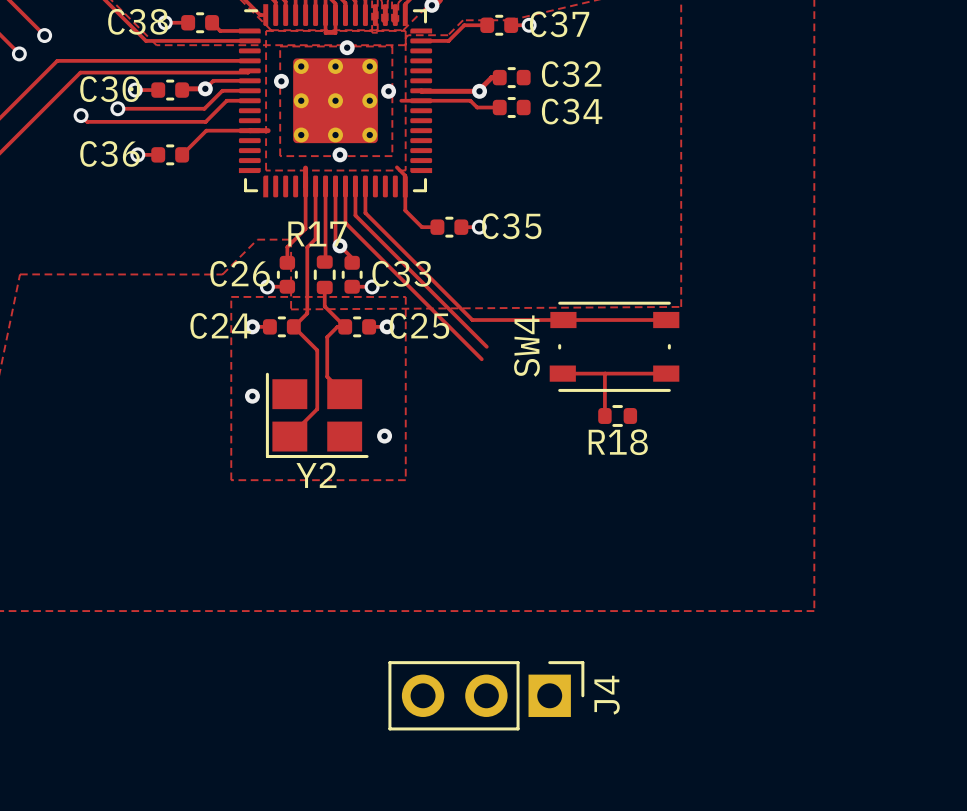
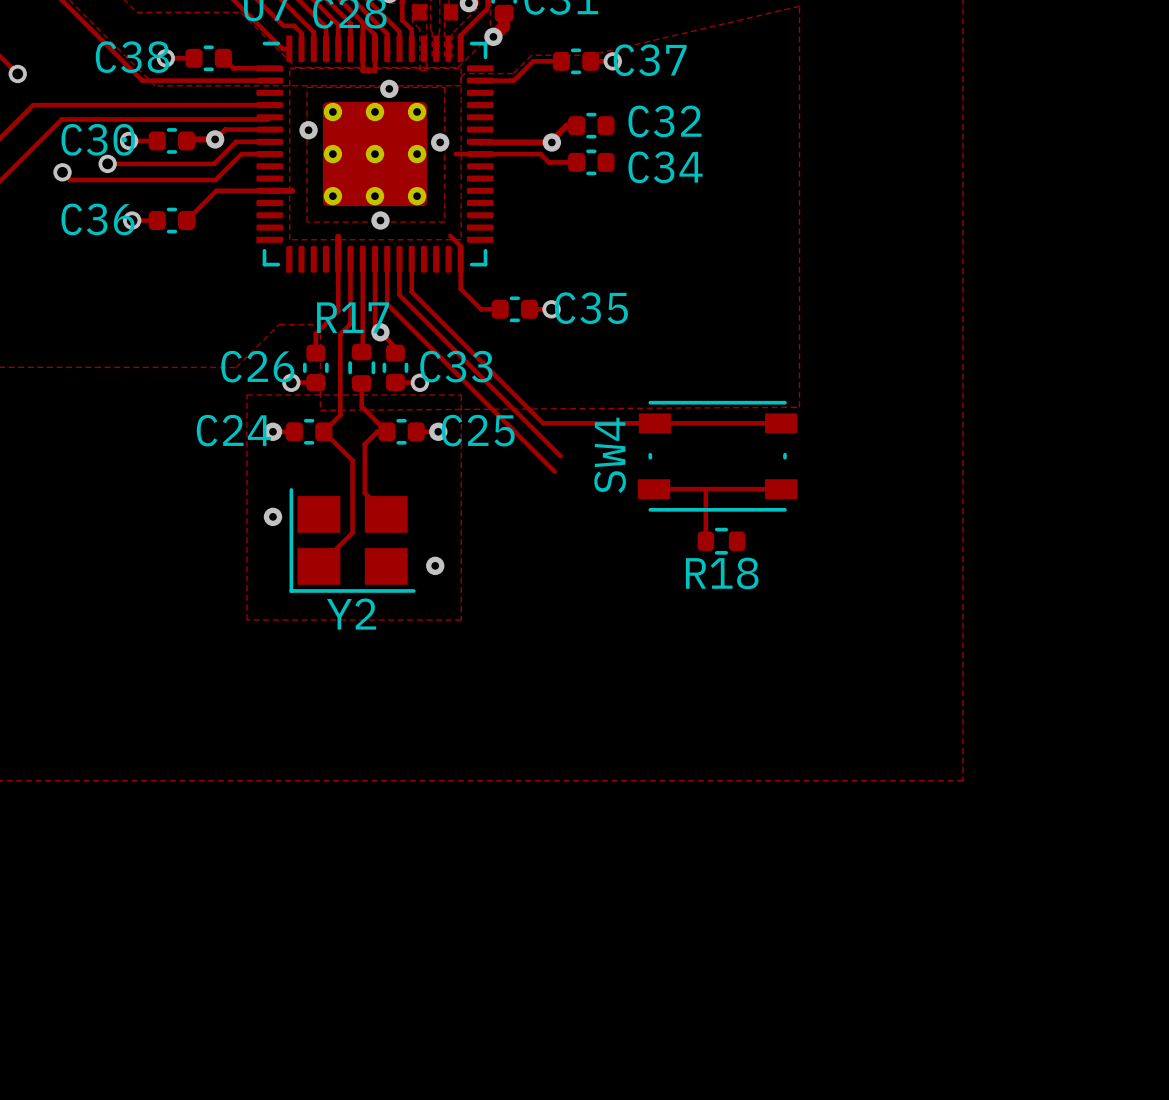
J4: (486, 695) -> none

